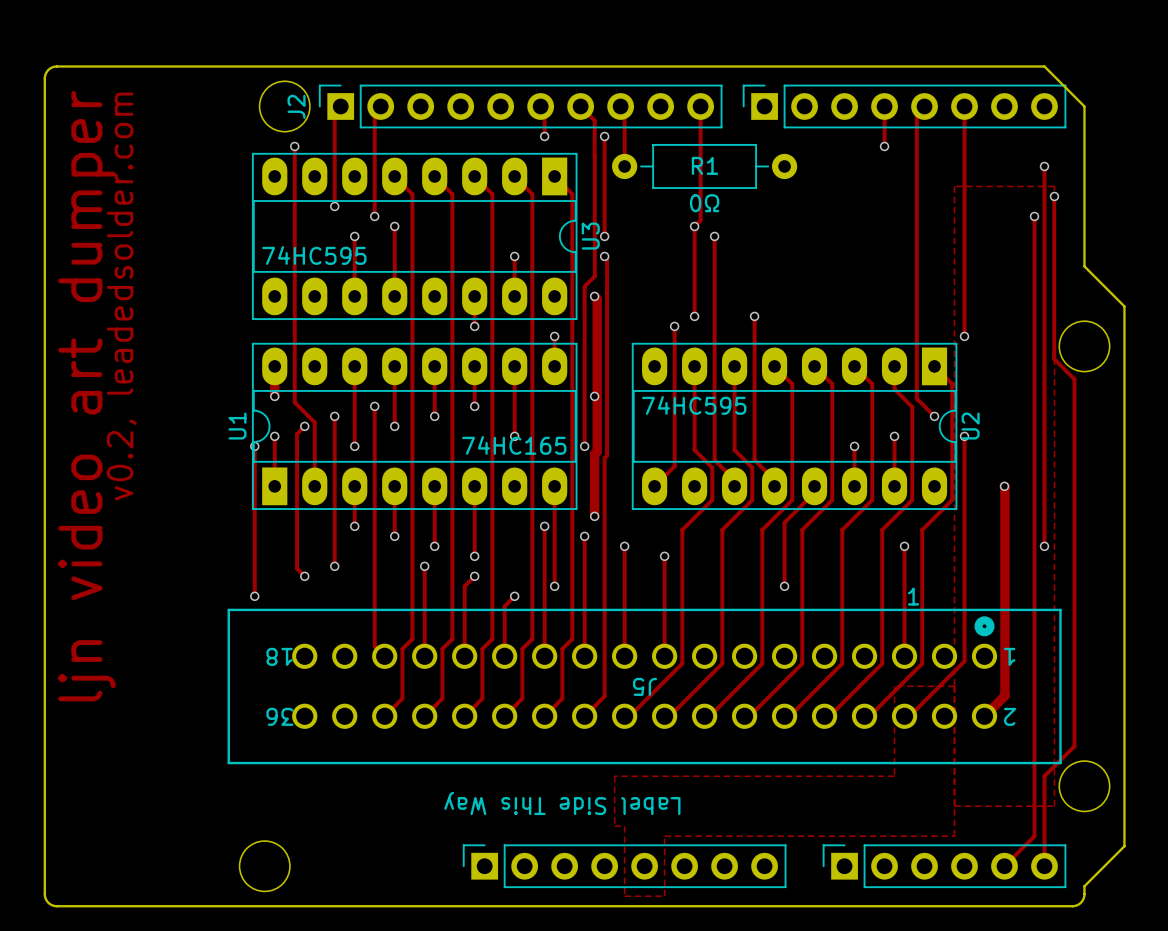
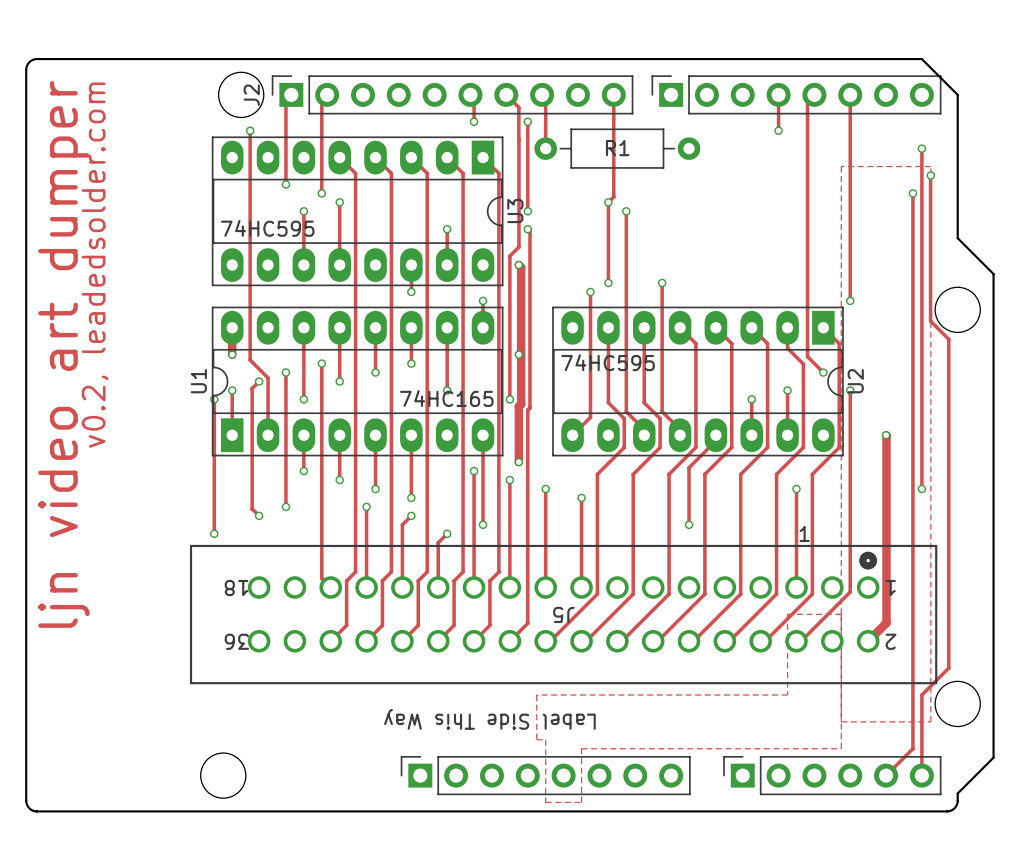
R1 value: 0Ω (704, 203) -> none

